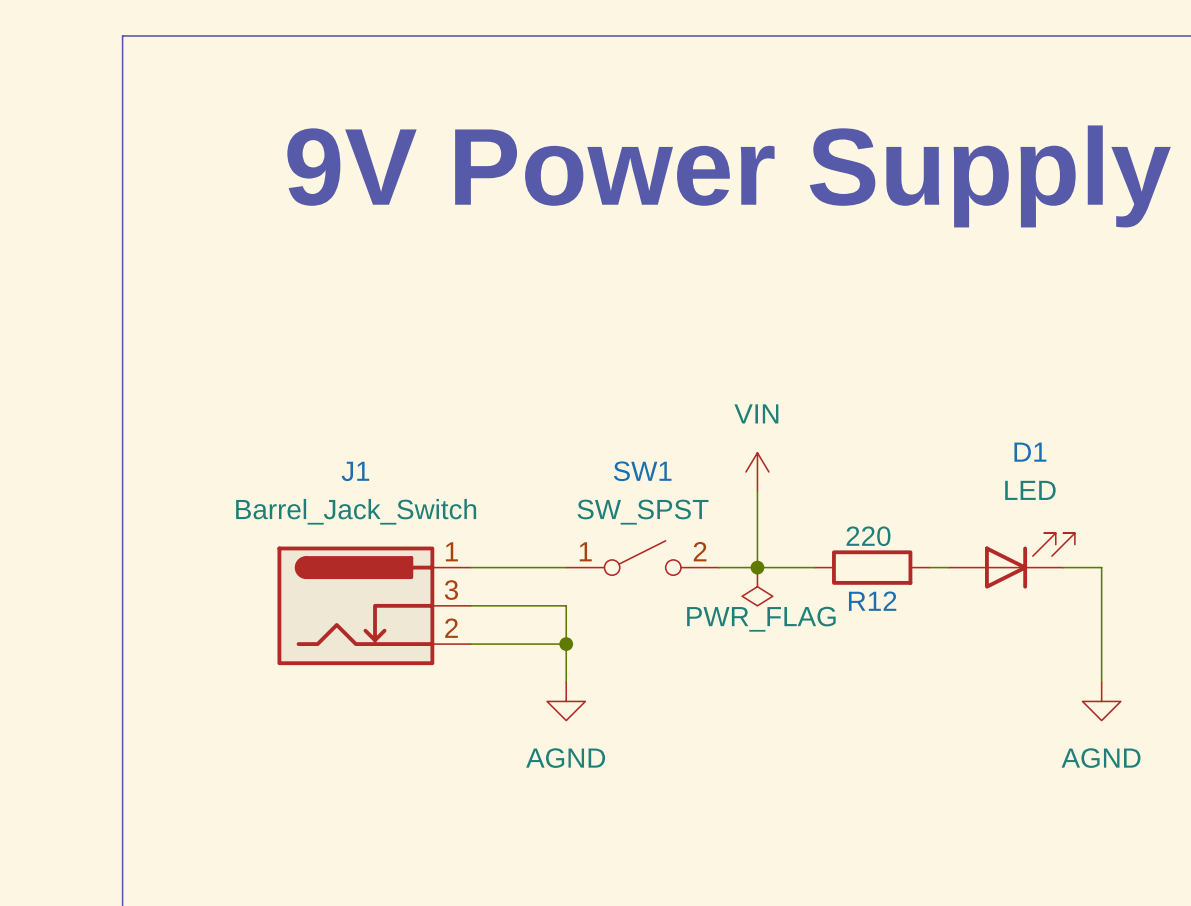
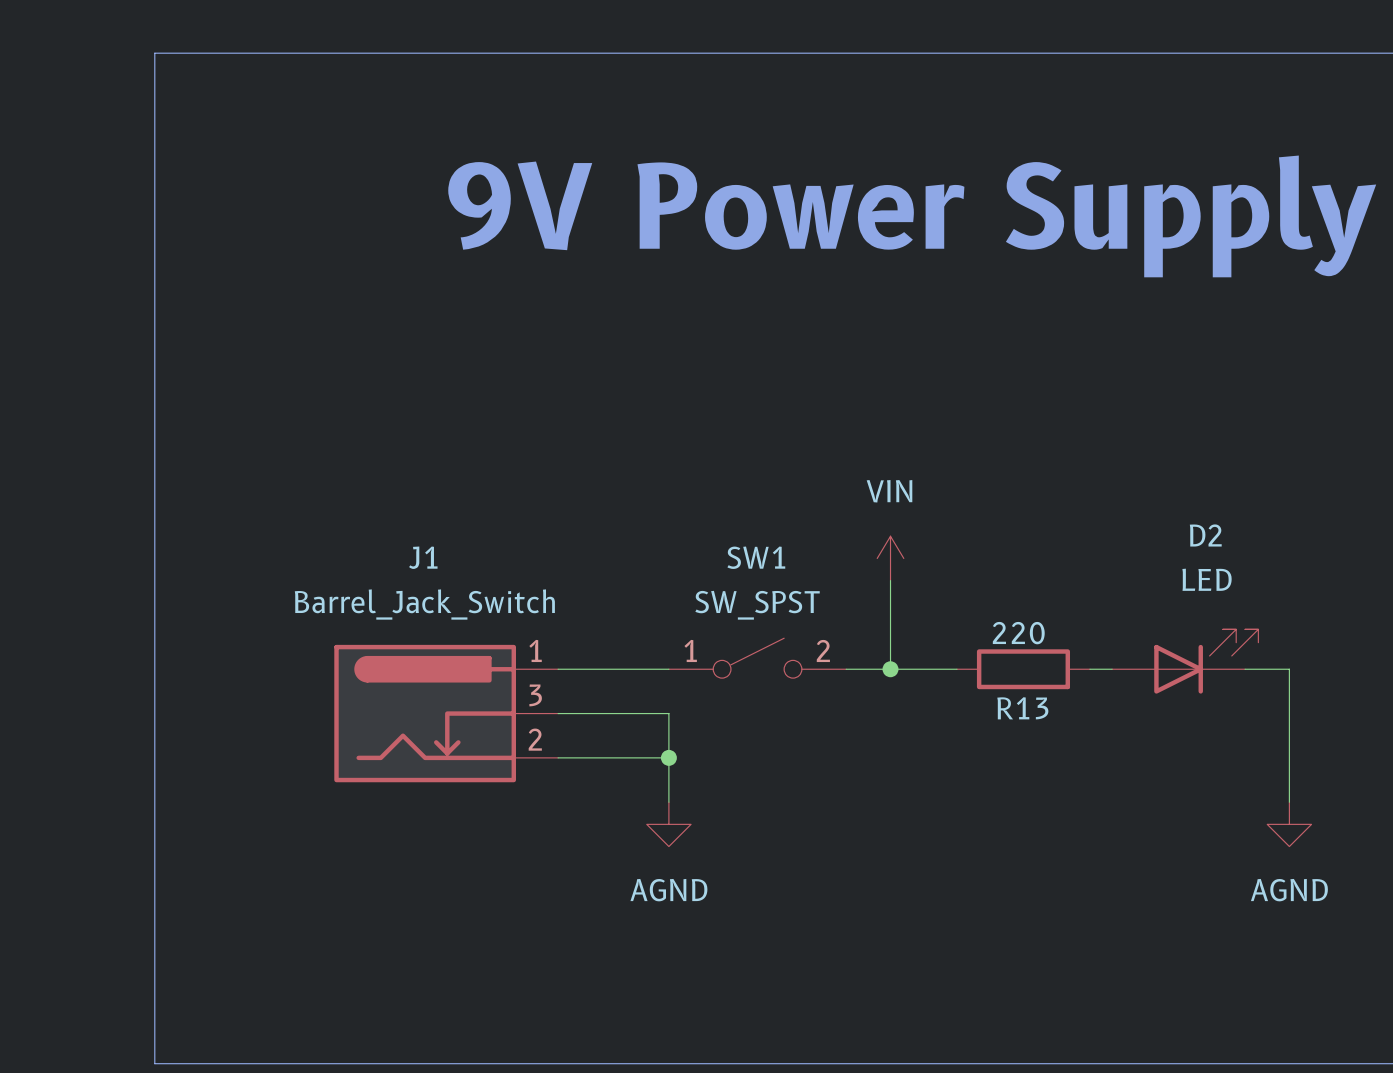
D1 name: D1 (1030, 452) -> D2 (1205, 535)
power symbol: PWR_FLAG (757, 586) -> none
R12 name: R12 (872, 601) -> R13 (1022, 708)

